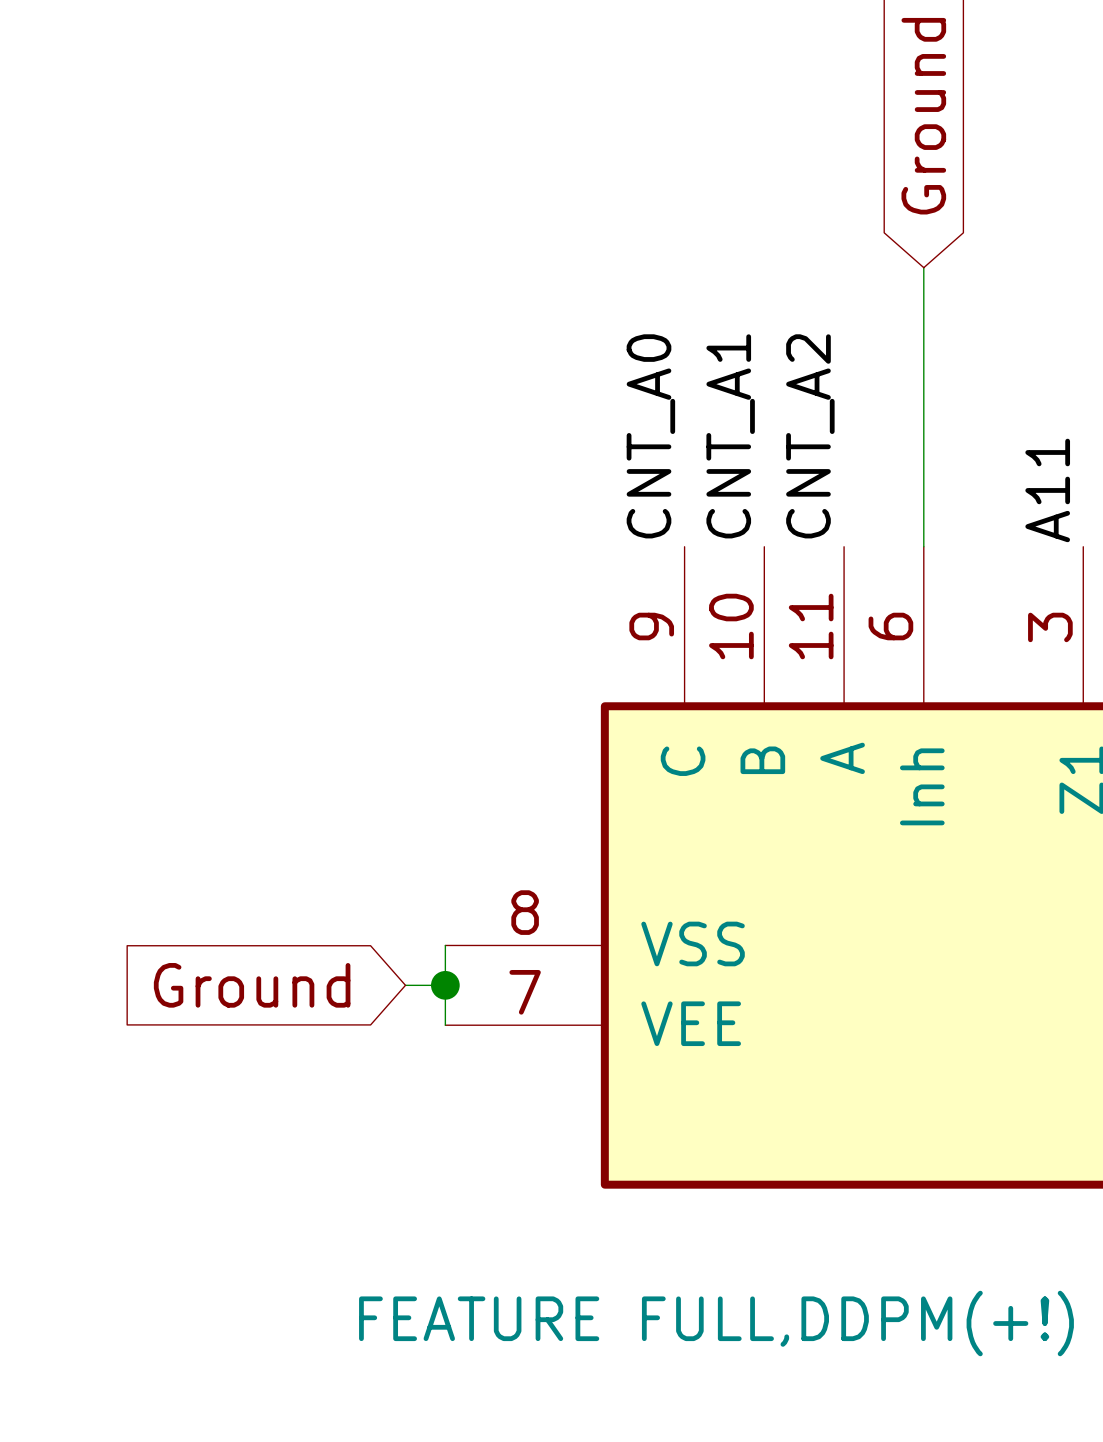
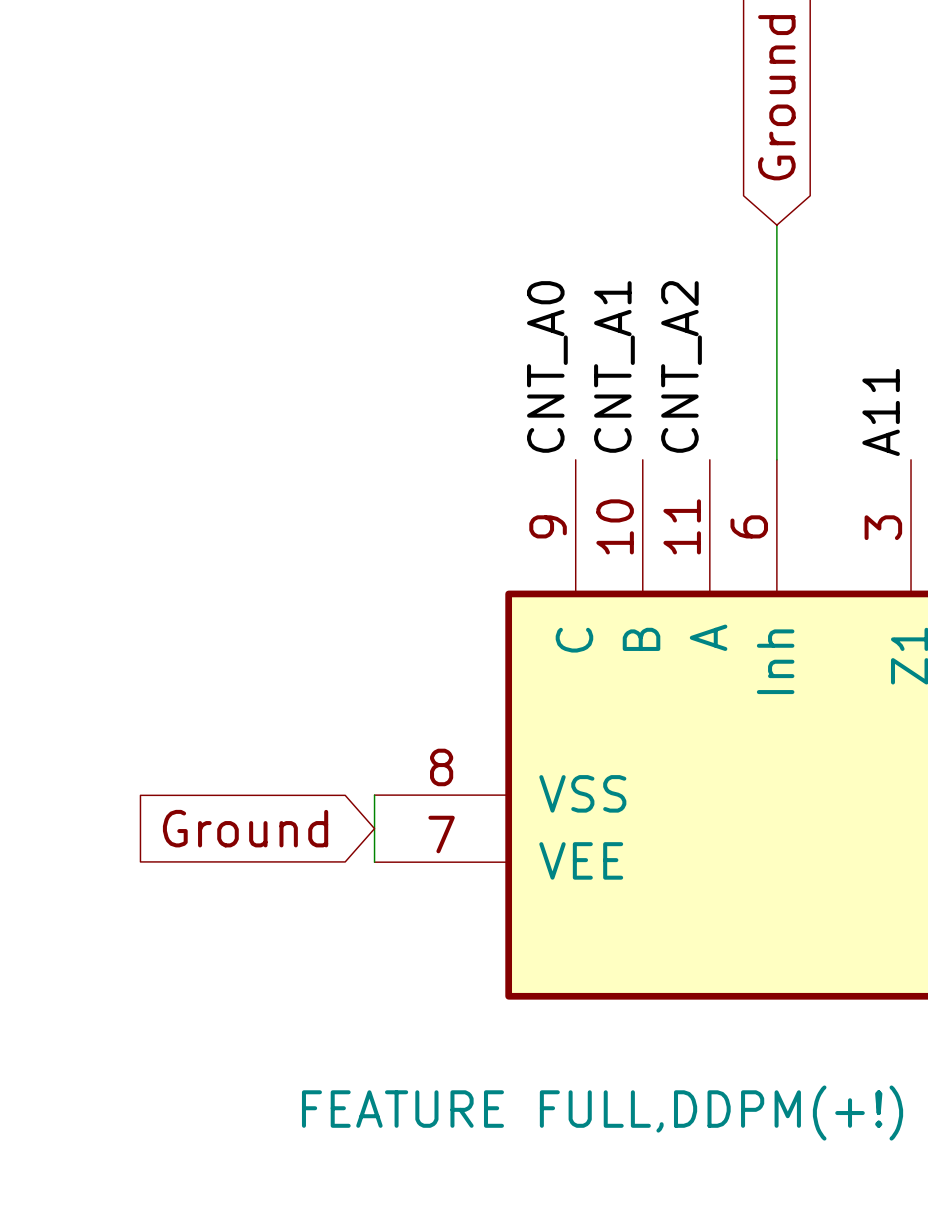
global label position: Ground (252, 985) -> Ground (245, 828)
wire: (405, 985) (445, 985) -> none
junction: (445, 985) -> none

